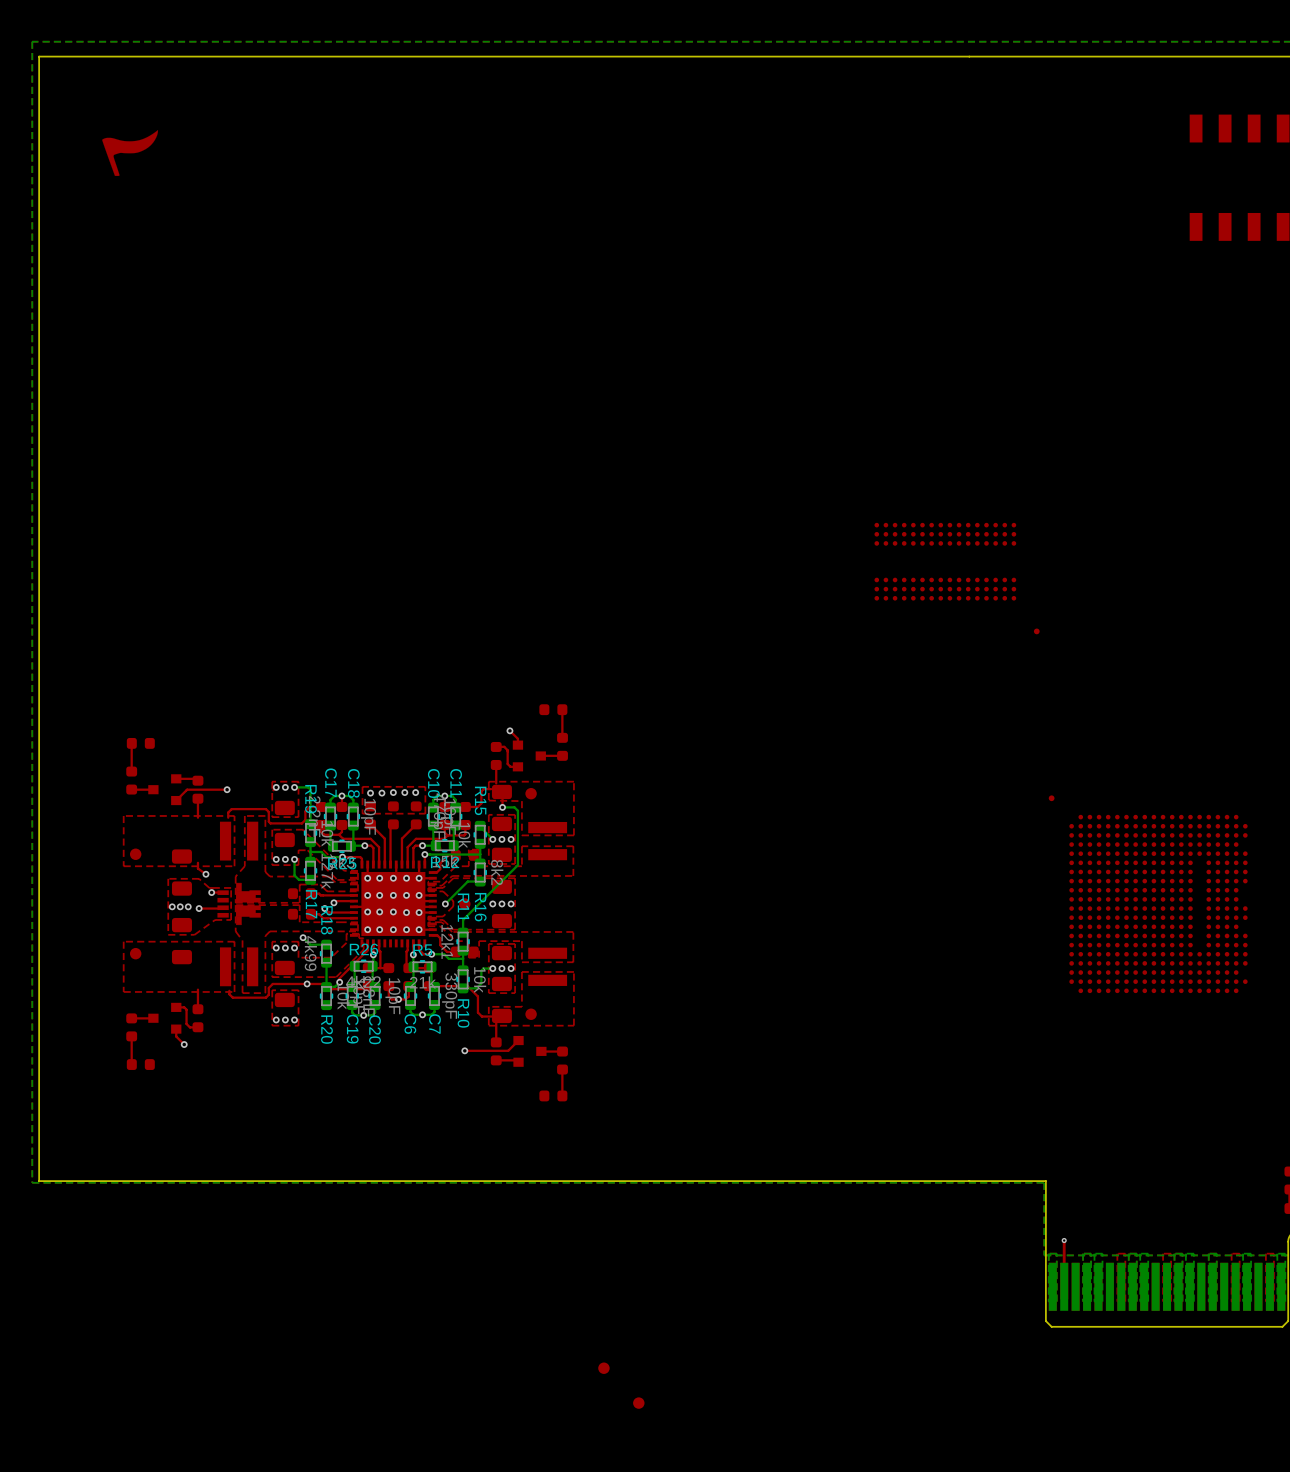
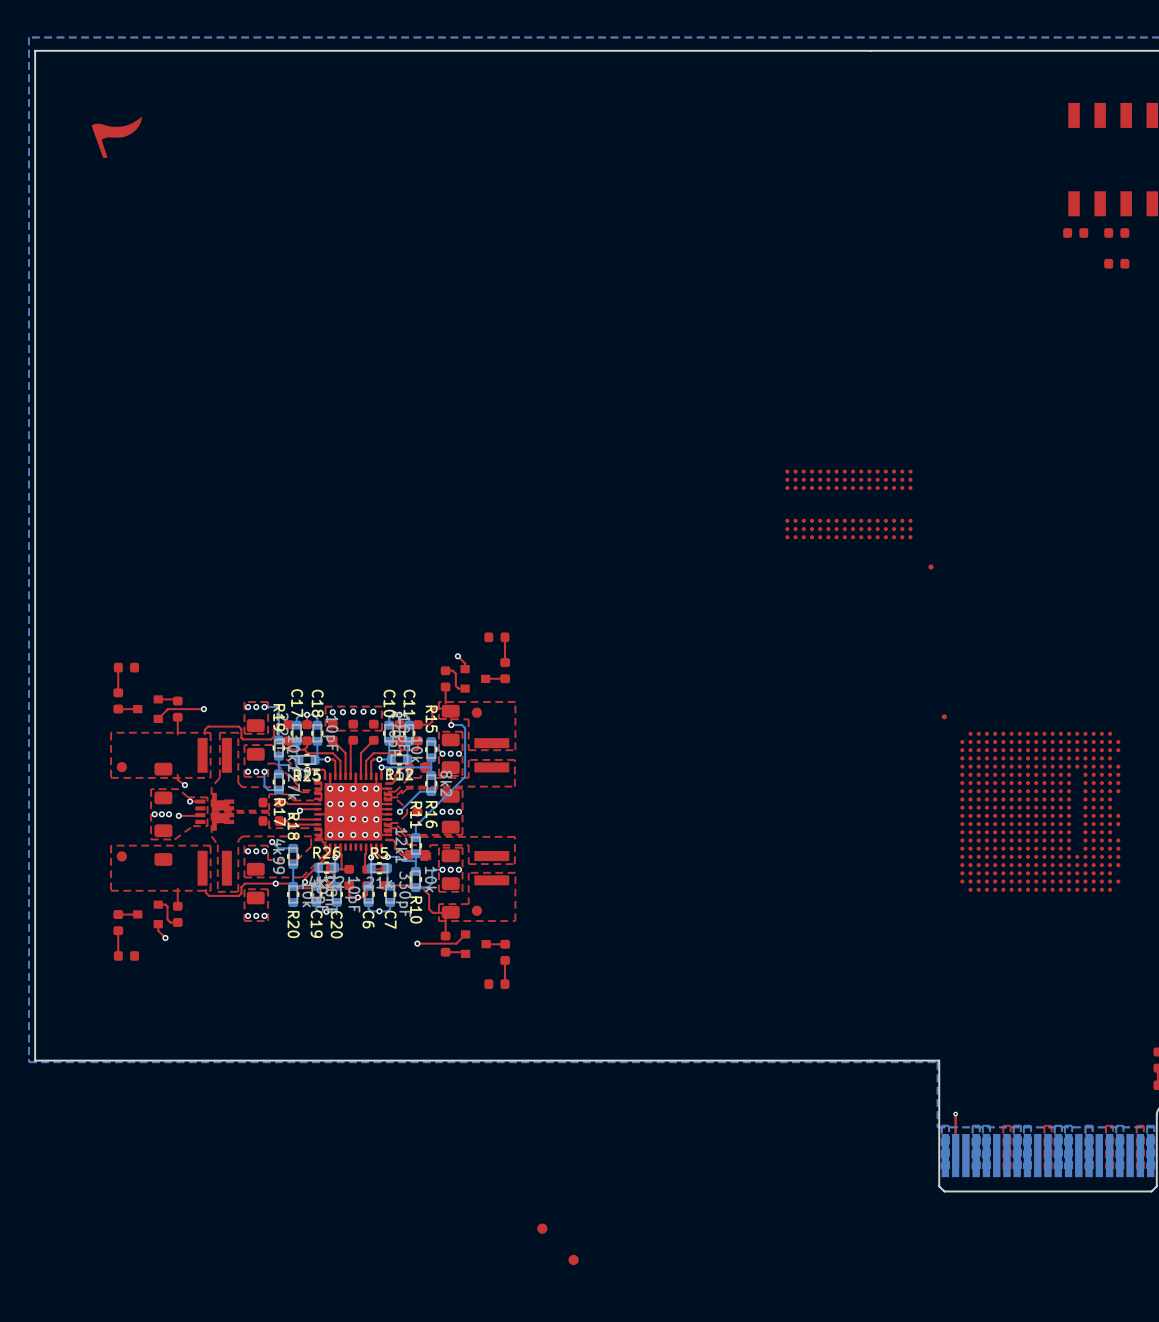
part: none -> (1075, 232)
part: none -> (1116, 232)
part: none -> (1116, 263)

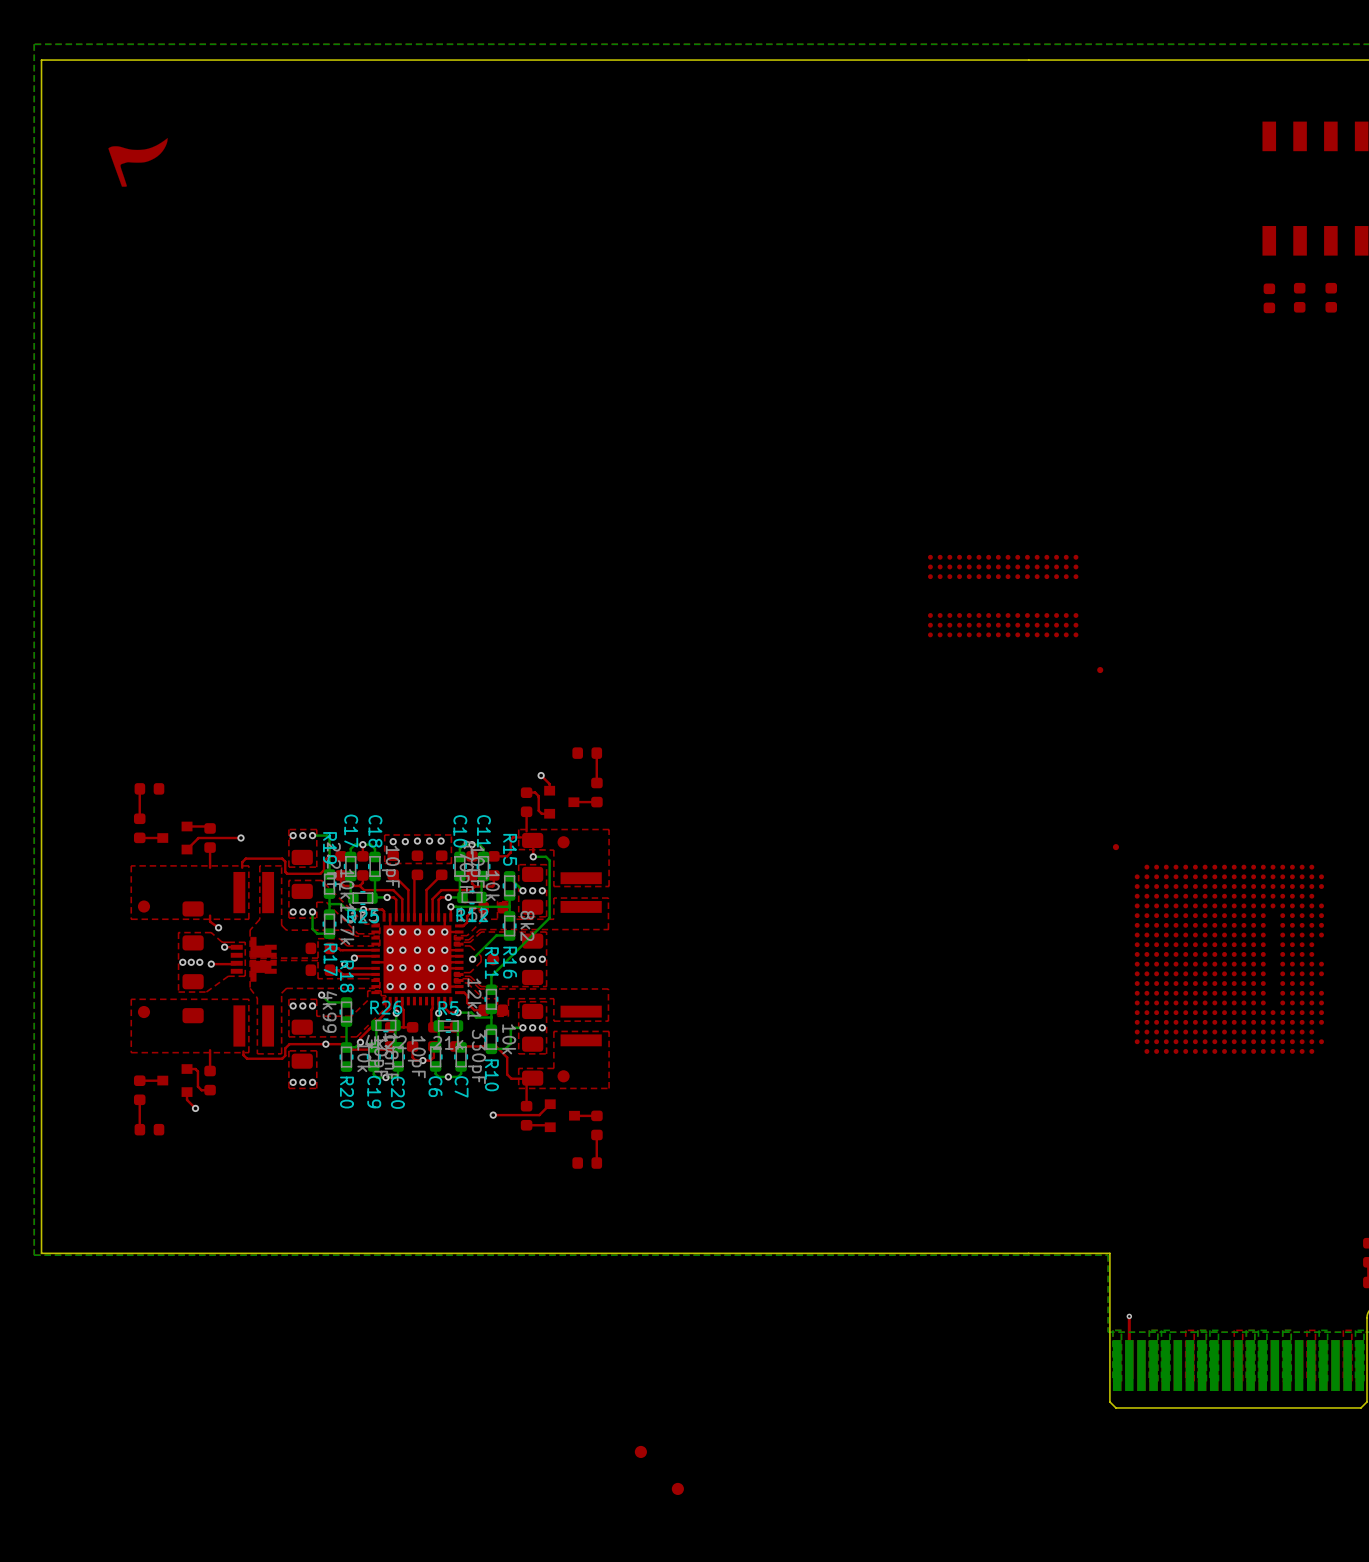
part: (1075, 232) -> none
part: (1116, 232) -> none
part: none -> (1299, 297)
part: none -> (1331, 297)
part: none -> (1269, 298)
part: (1116, 263) -> none

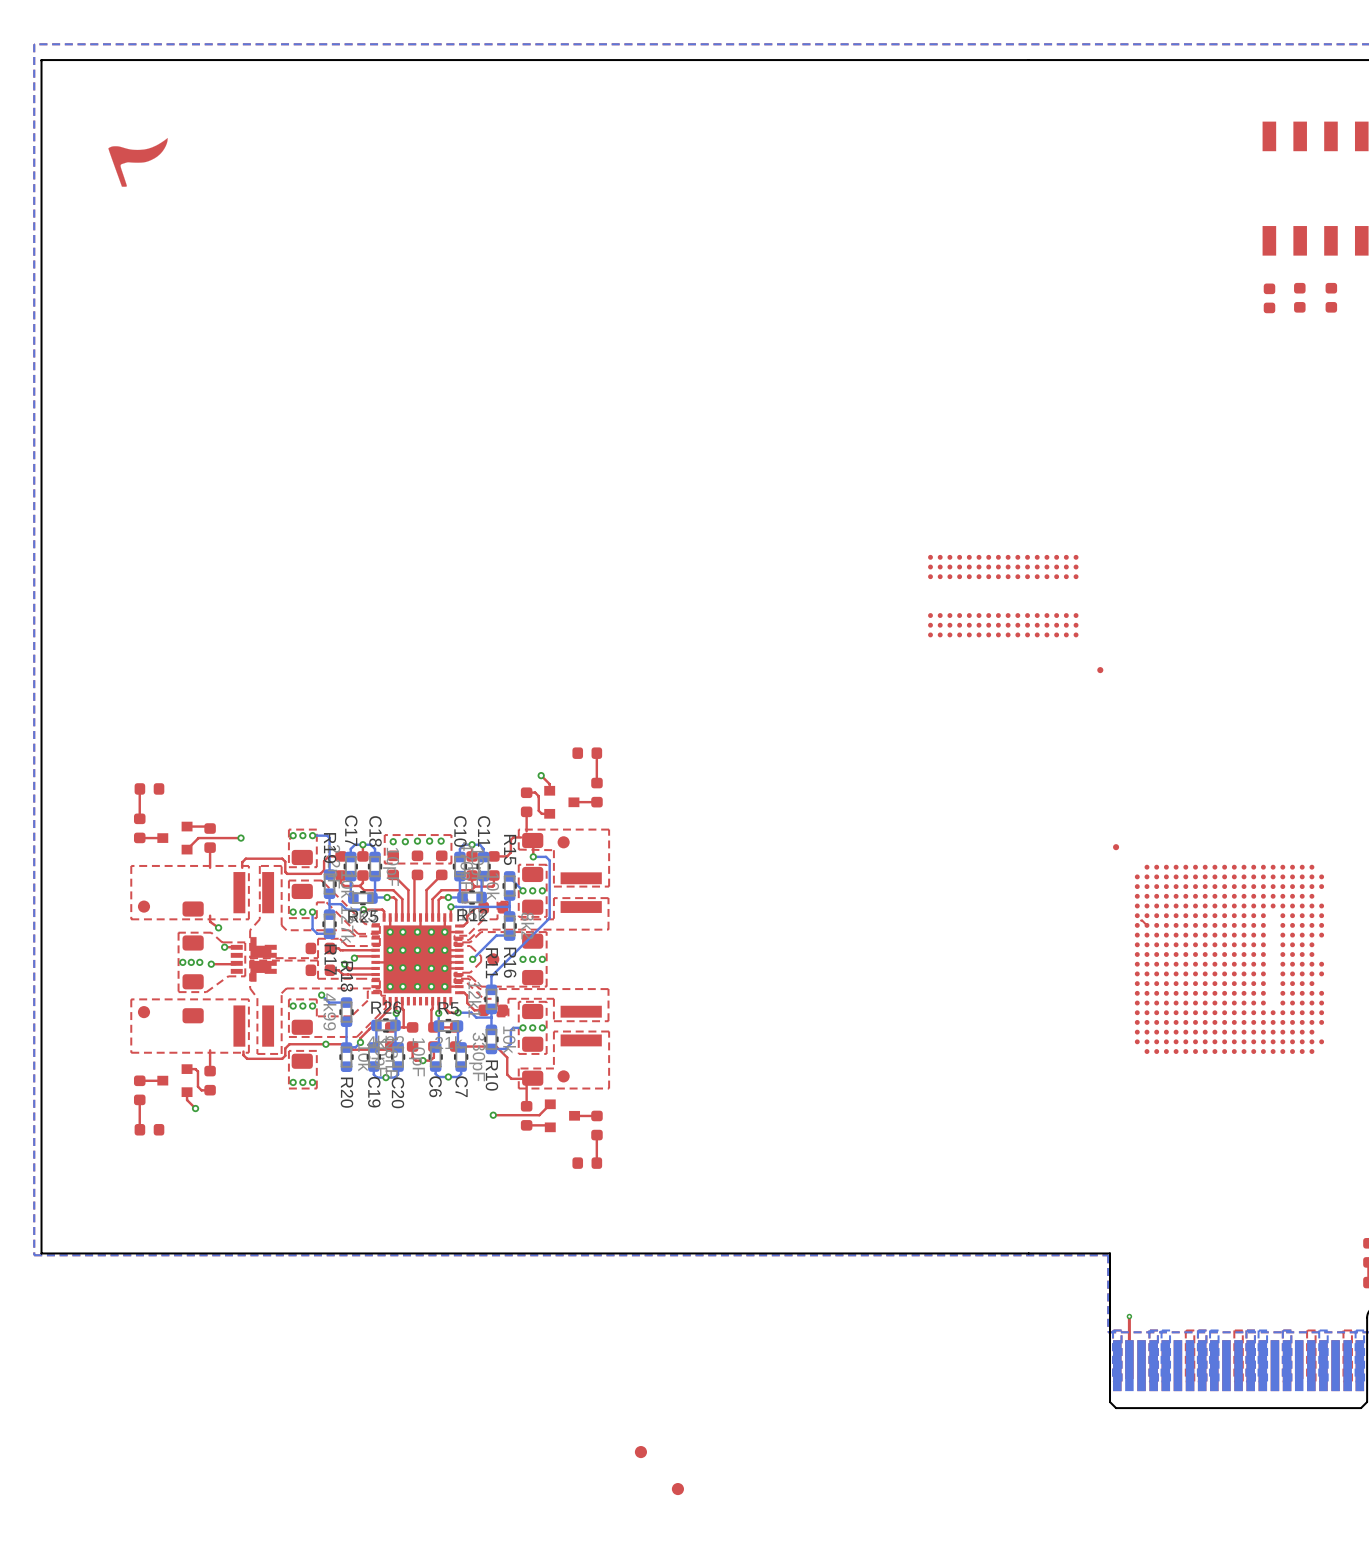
top track: none -> (1140, 920) (1146, 925)

